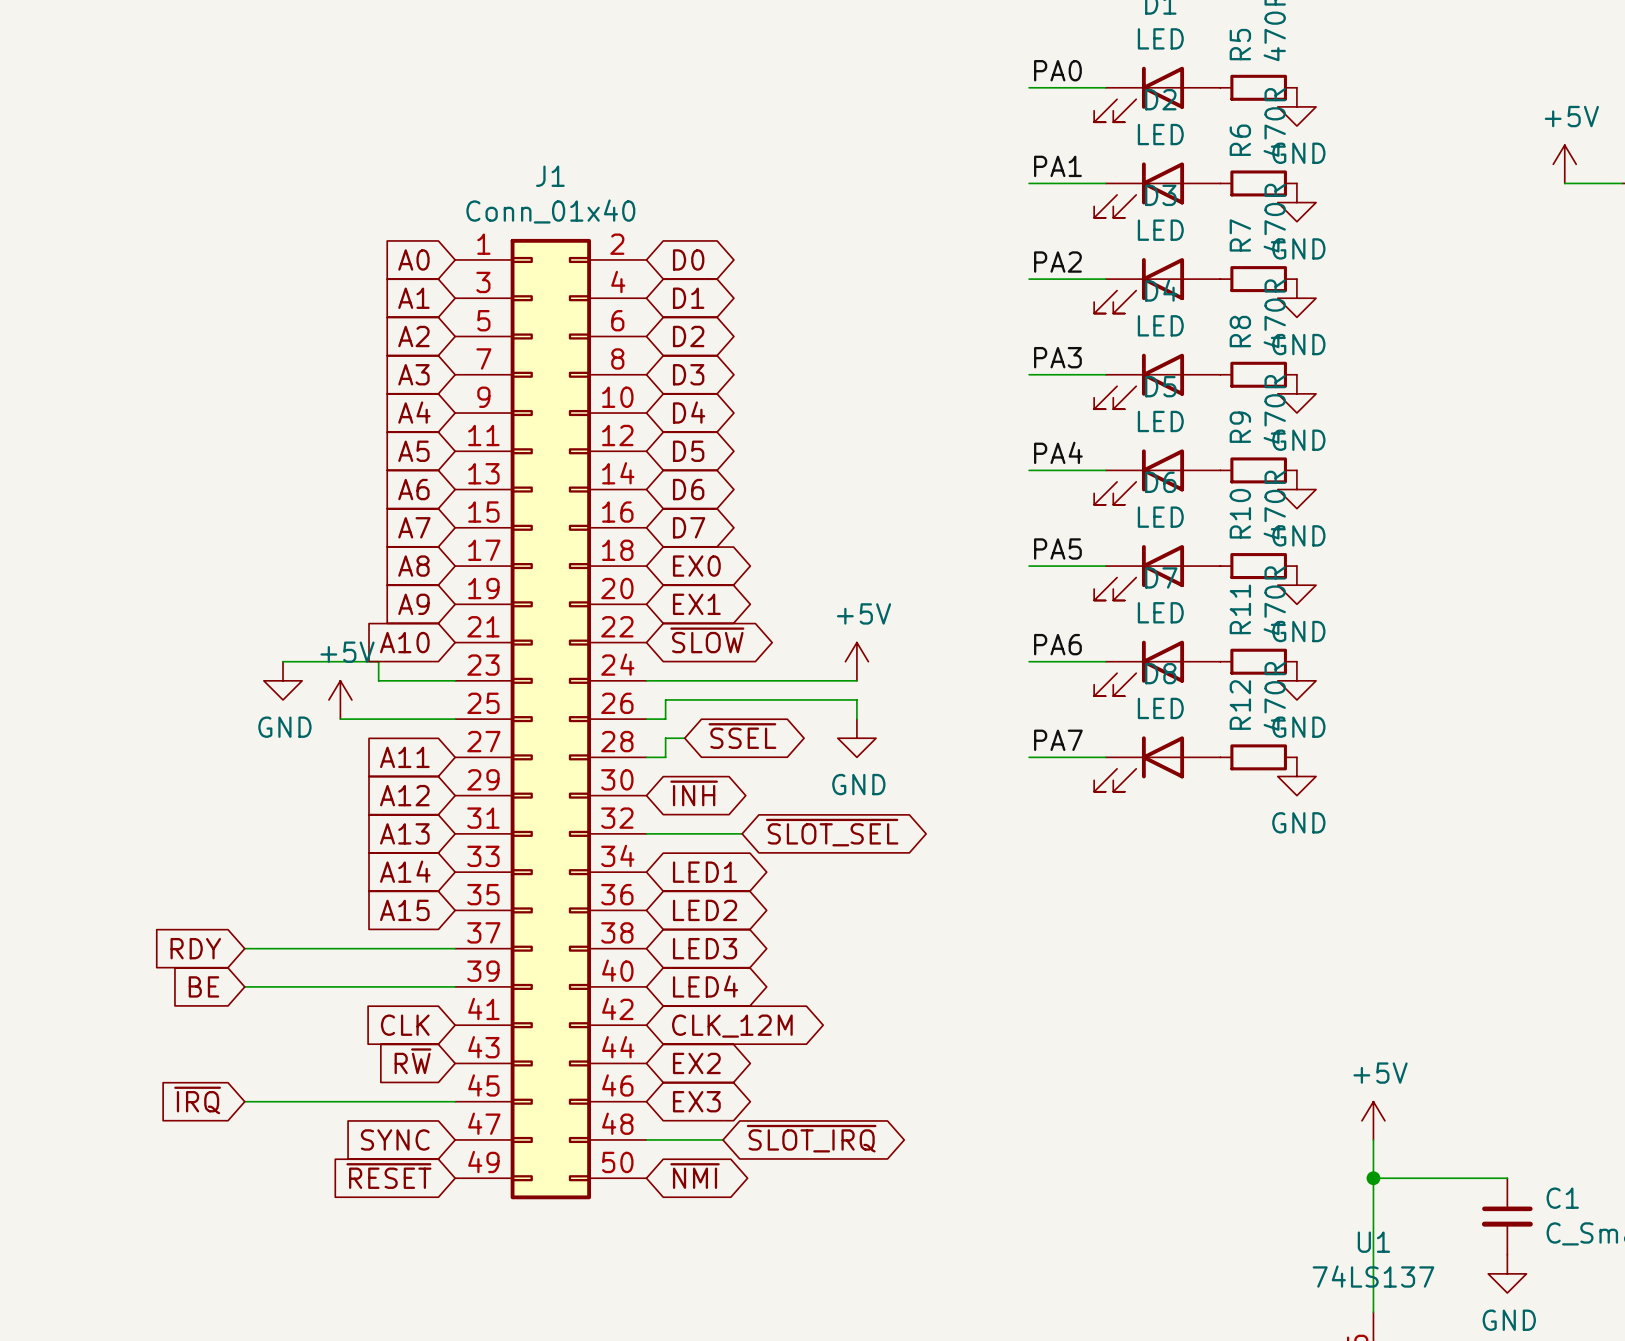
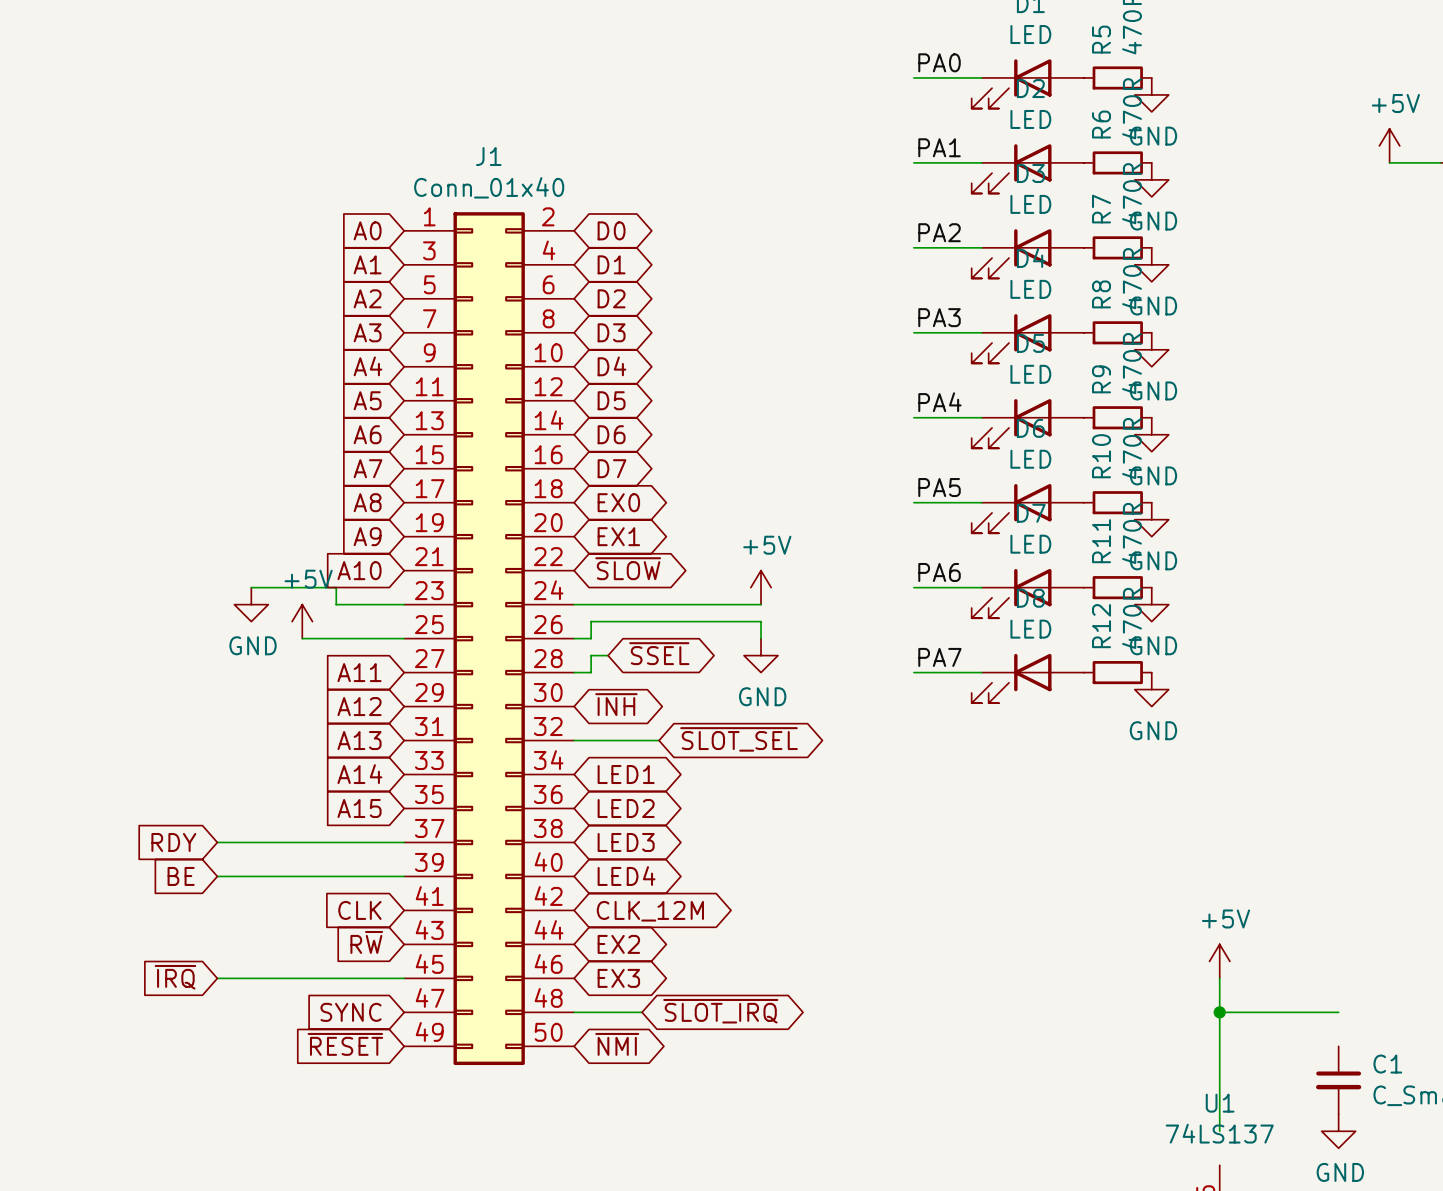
wire: none -> (1219, 978) (1219, 1012) (1338, 1012)
power symbol position: +5V (1373, 1120) -> +5V (1219, 961)
wire: (1373, 1178) (1507, 1178) -> none
junction position: (1373, 1178) -> (1219, 1012)
wire: (1373, 1273) (1373, 1312) -> none

